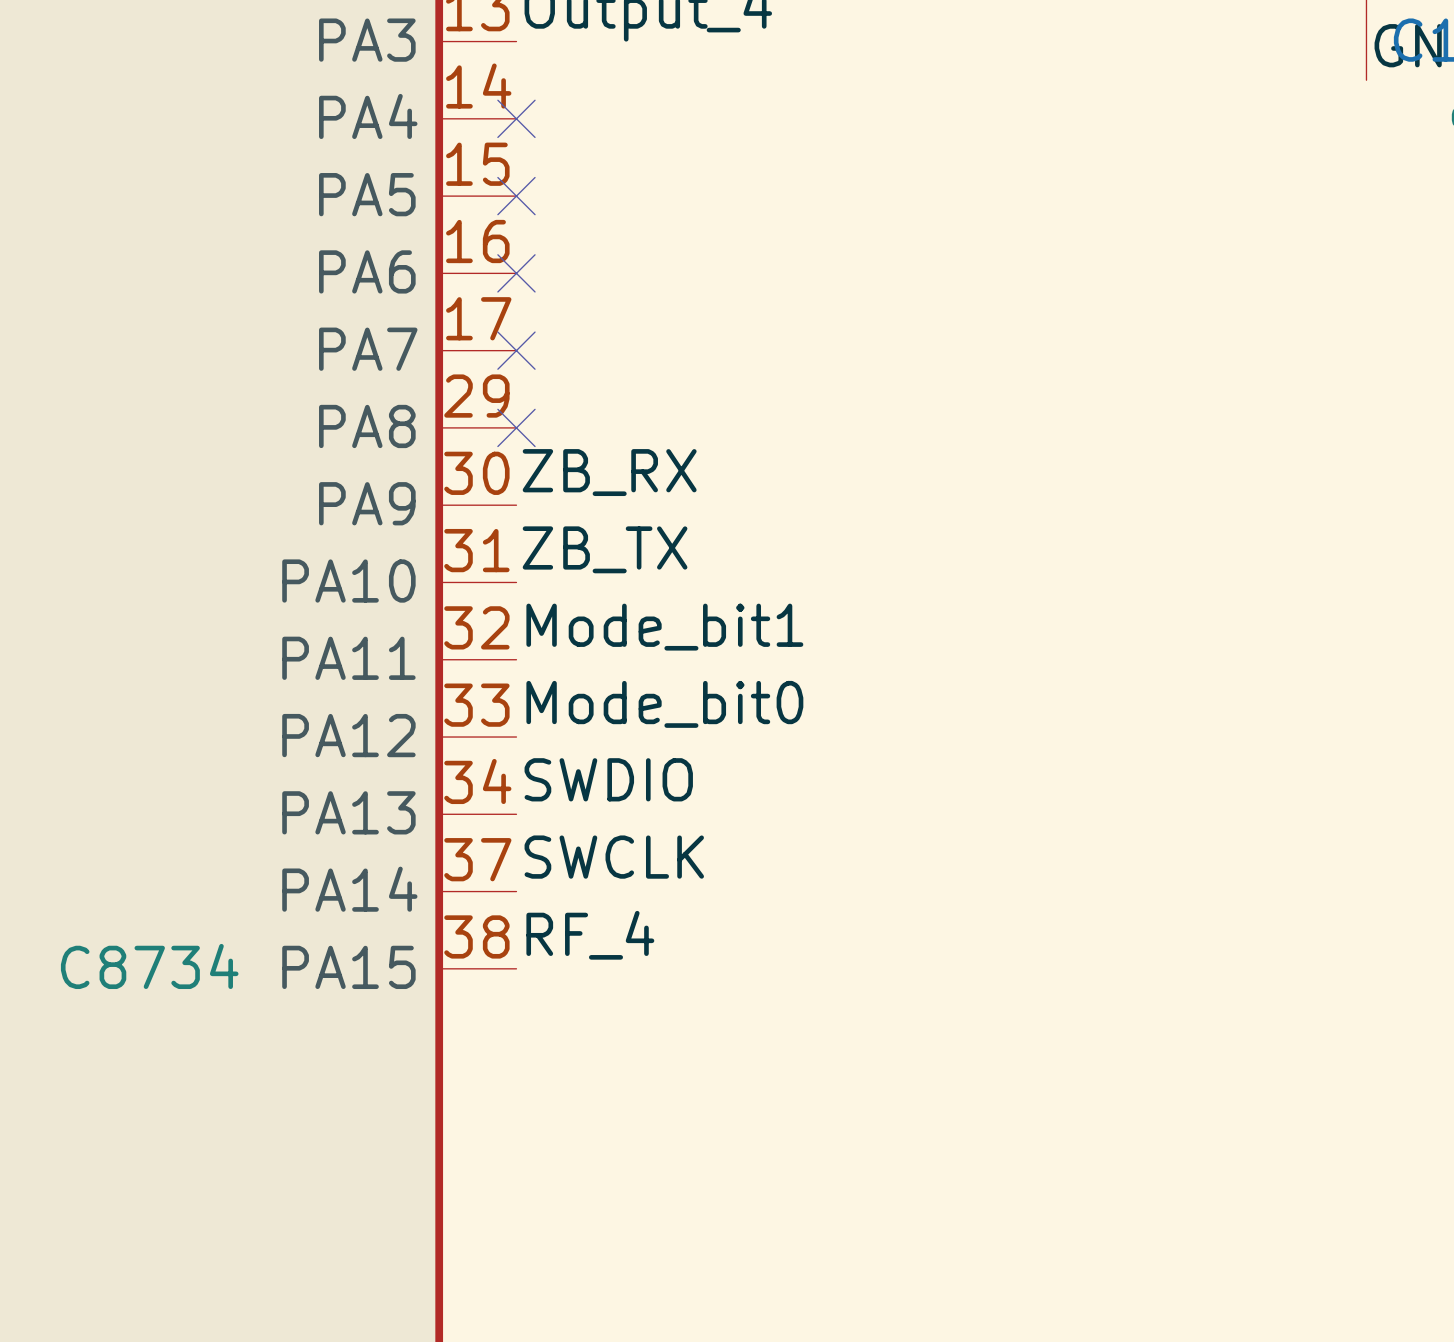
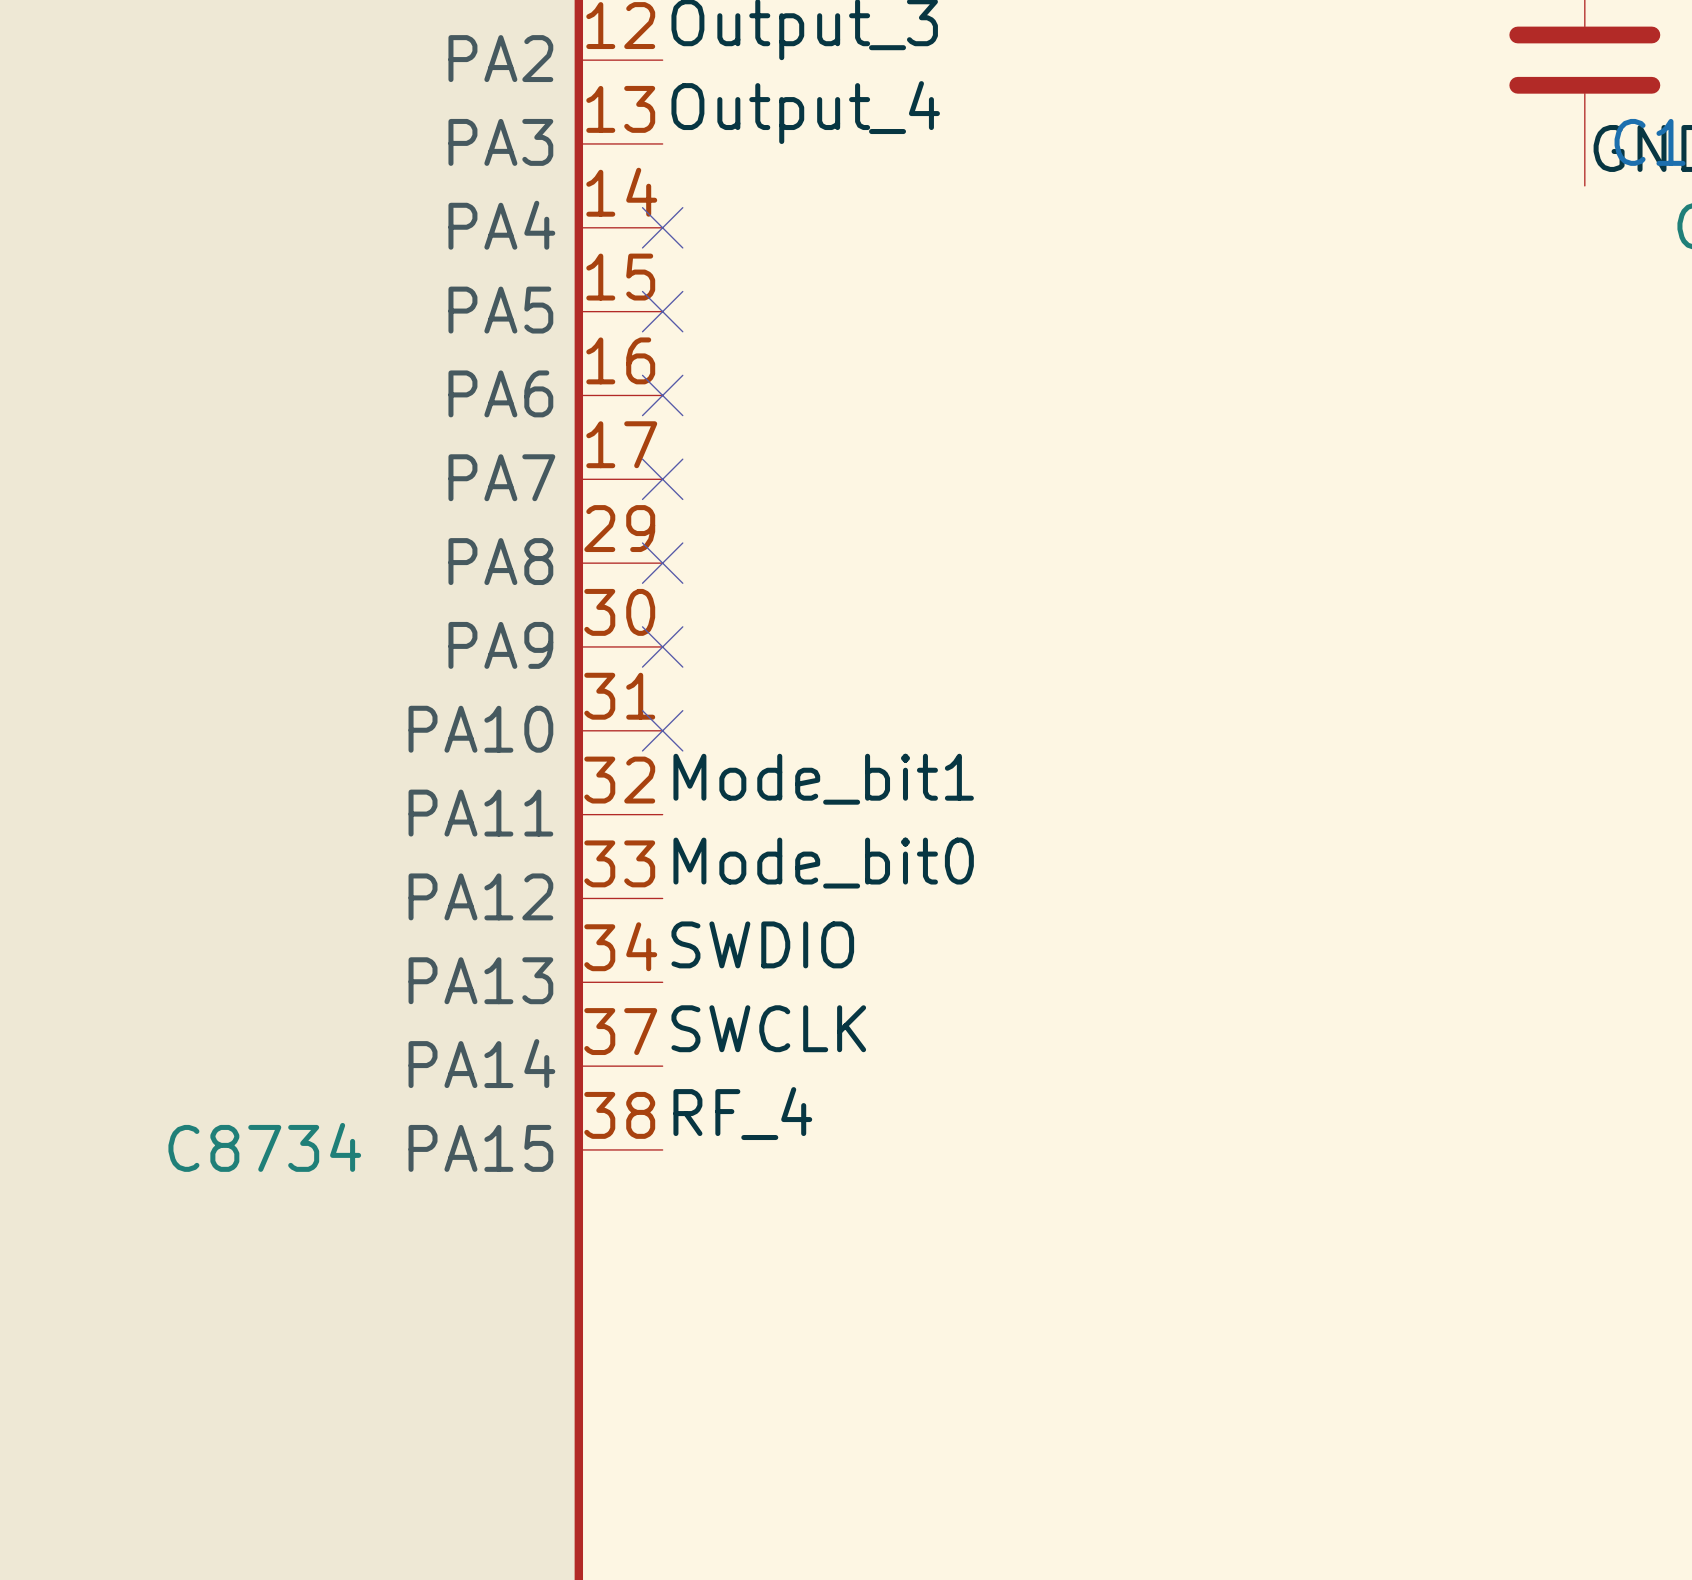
label: ZB_RX (609, 472) -> none
no-connect mark: none -> (662, 646)
label: ZB_TX (605, 549) -> none
no-connect mark: none -> (662, 730)

